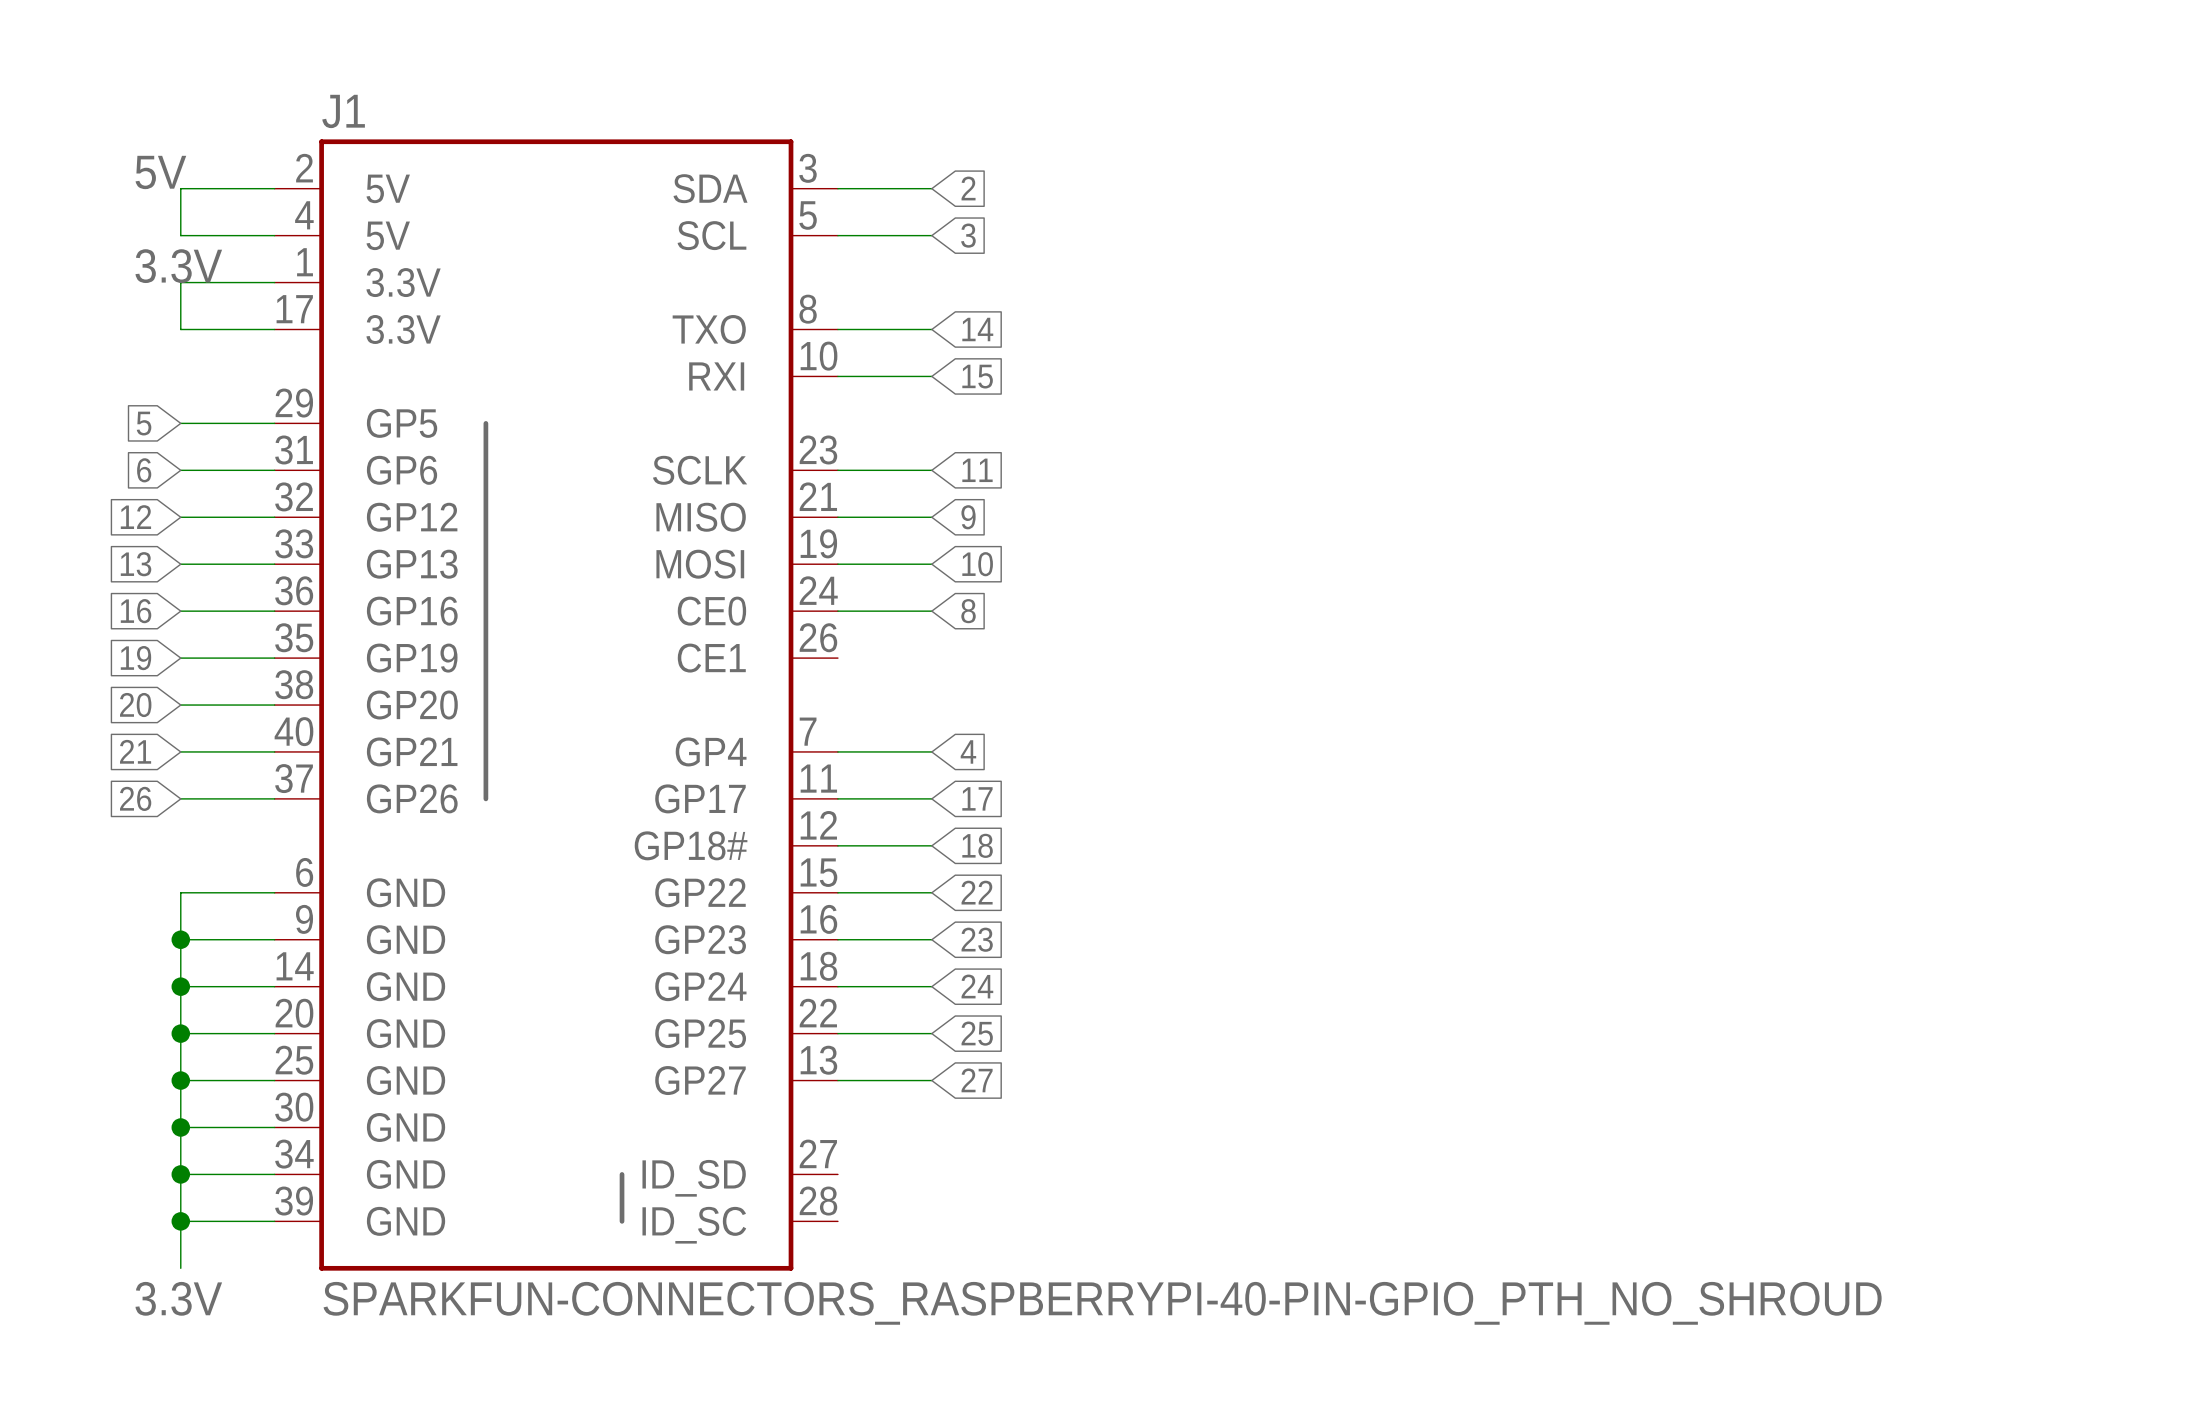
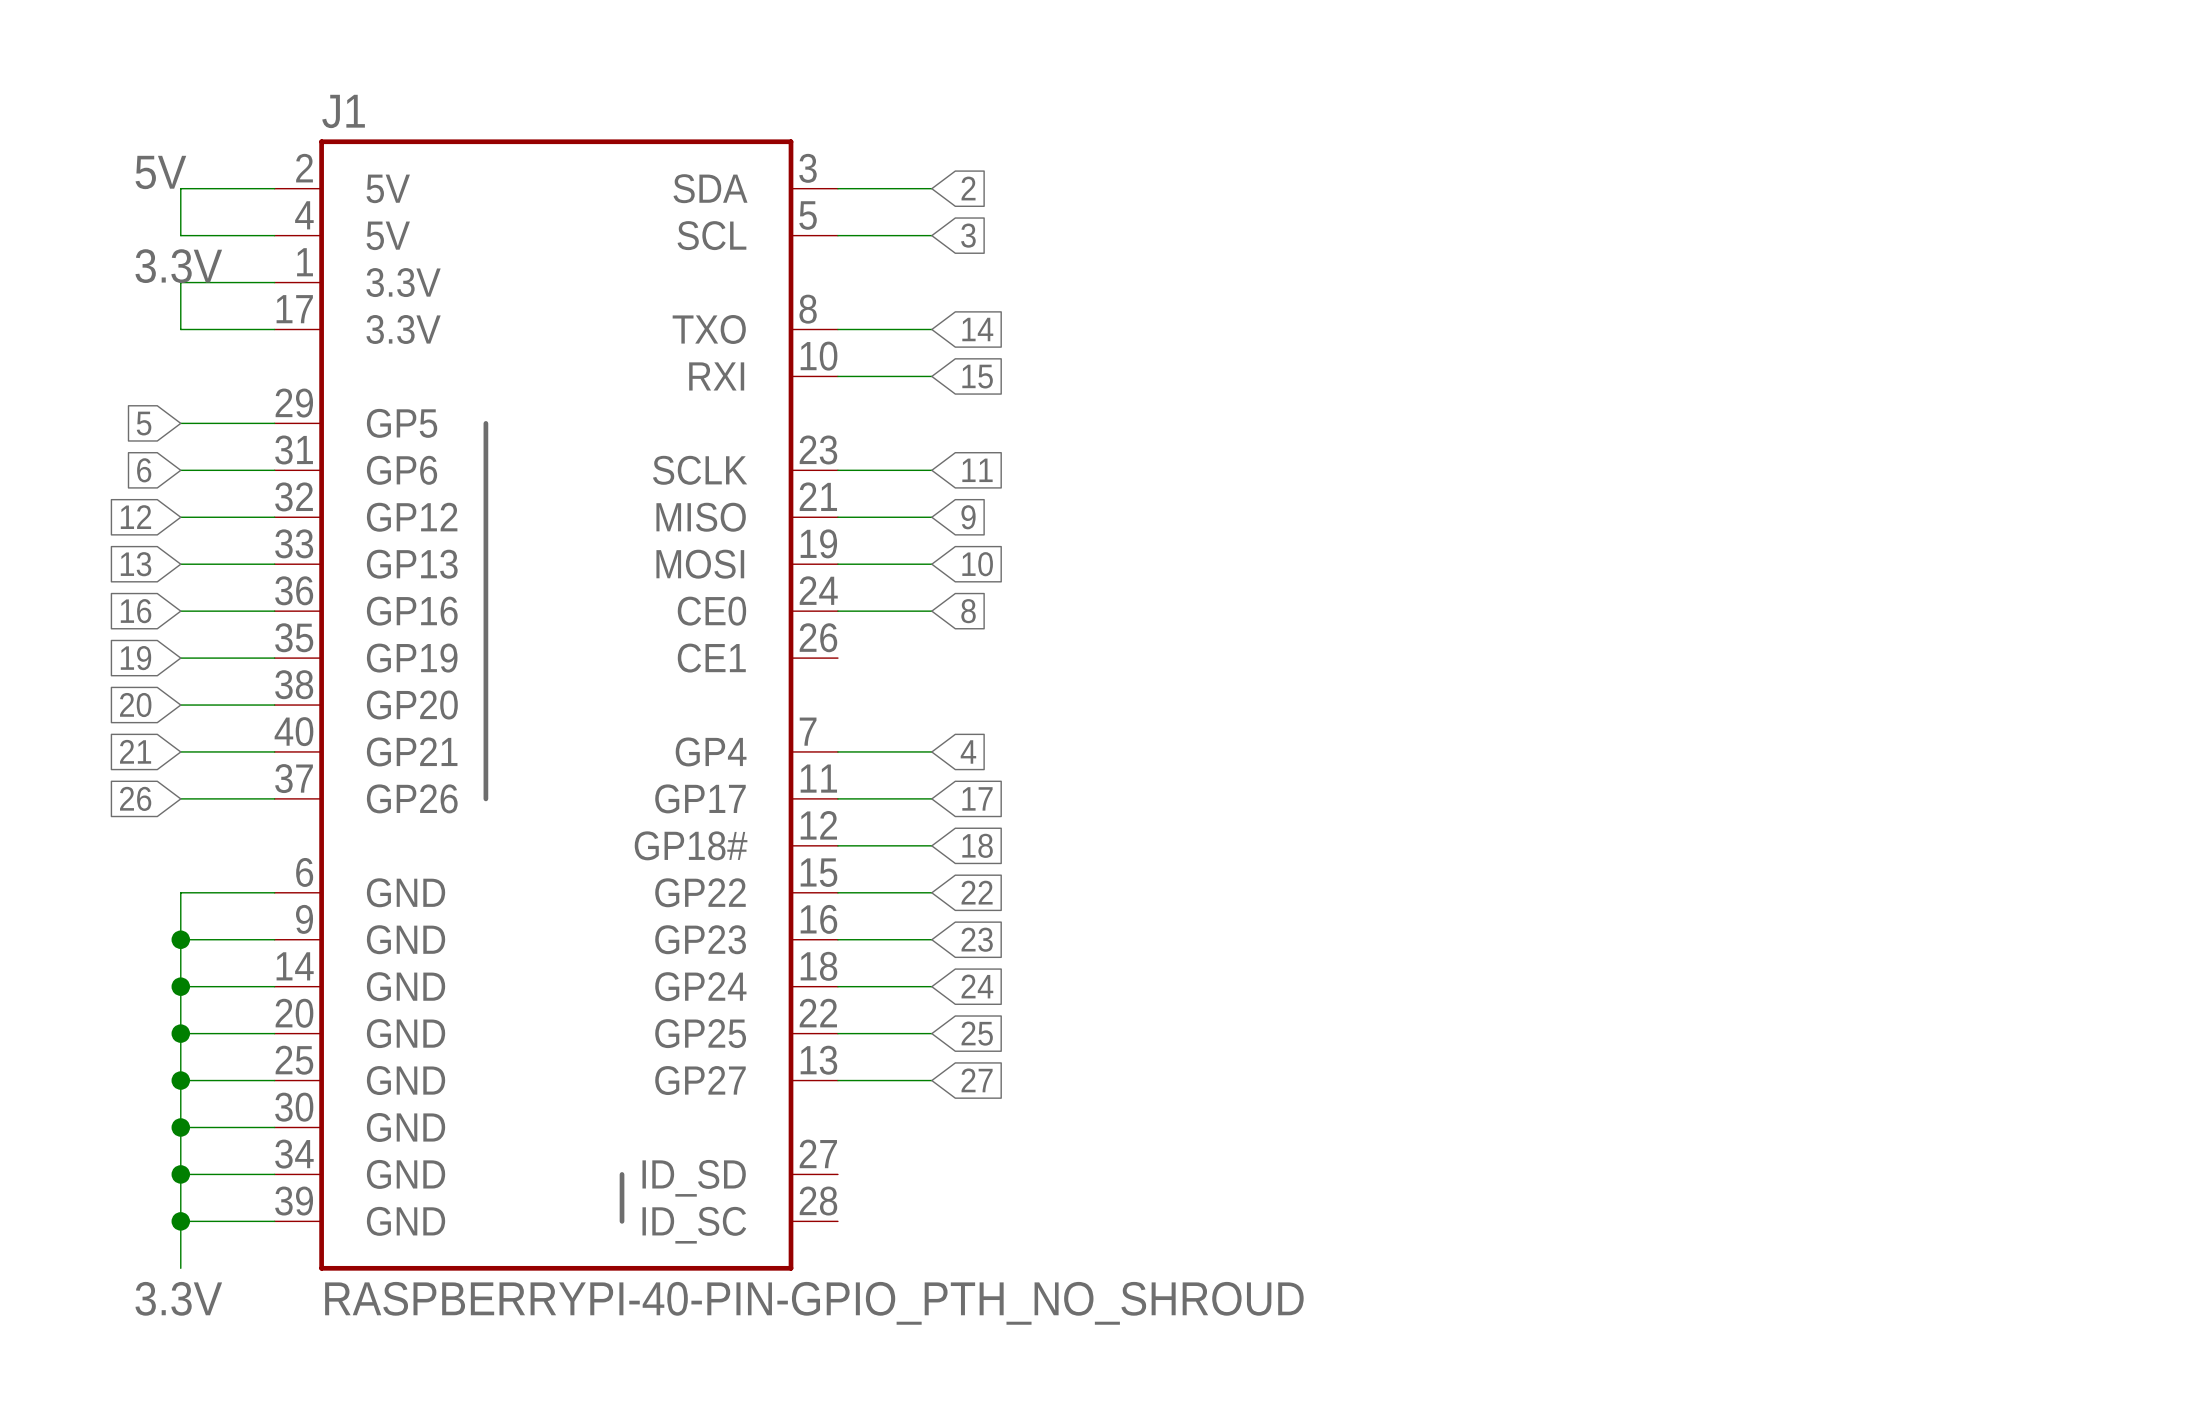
J1 value: SPARKFUN-CONNECTORS_RASPBERRYPI-40-PIN-GPIO_PTH_NO_SHROUD (1102, 1303) -> RASPBERRYPI-40-PIN-GPIO_PTH_NO_SHROUD (814, 1303)

